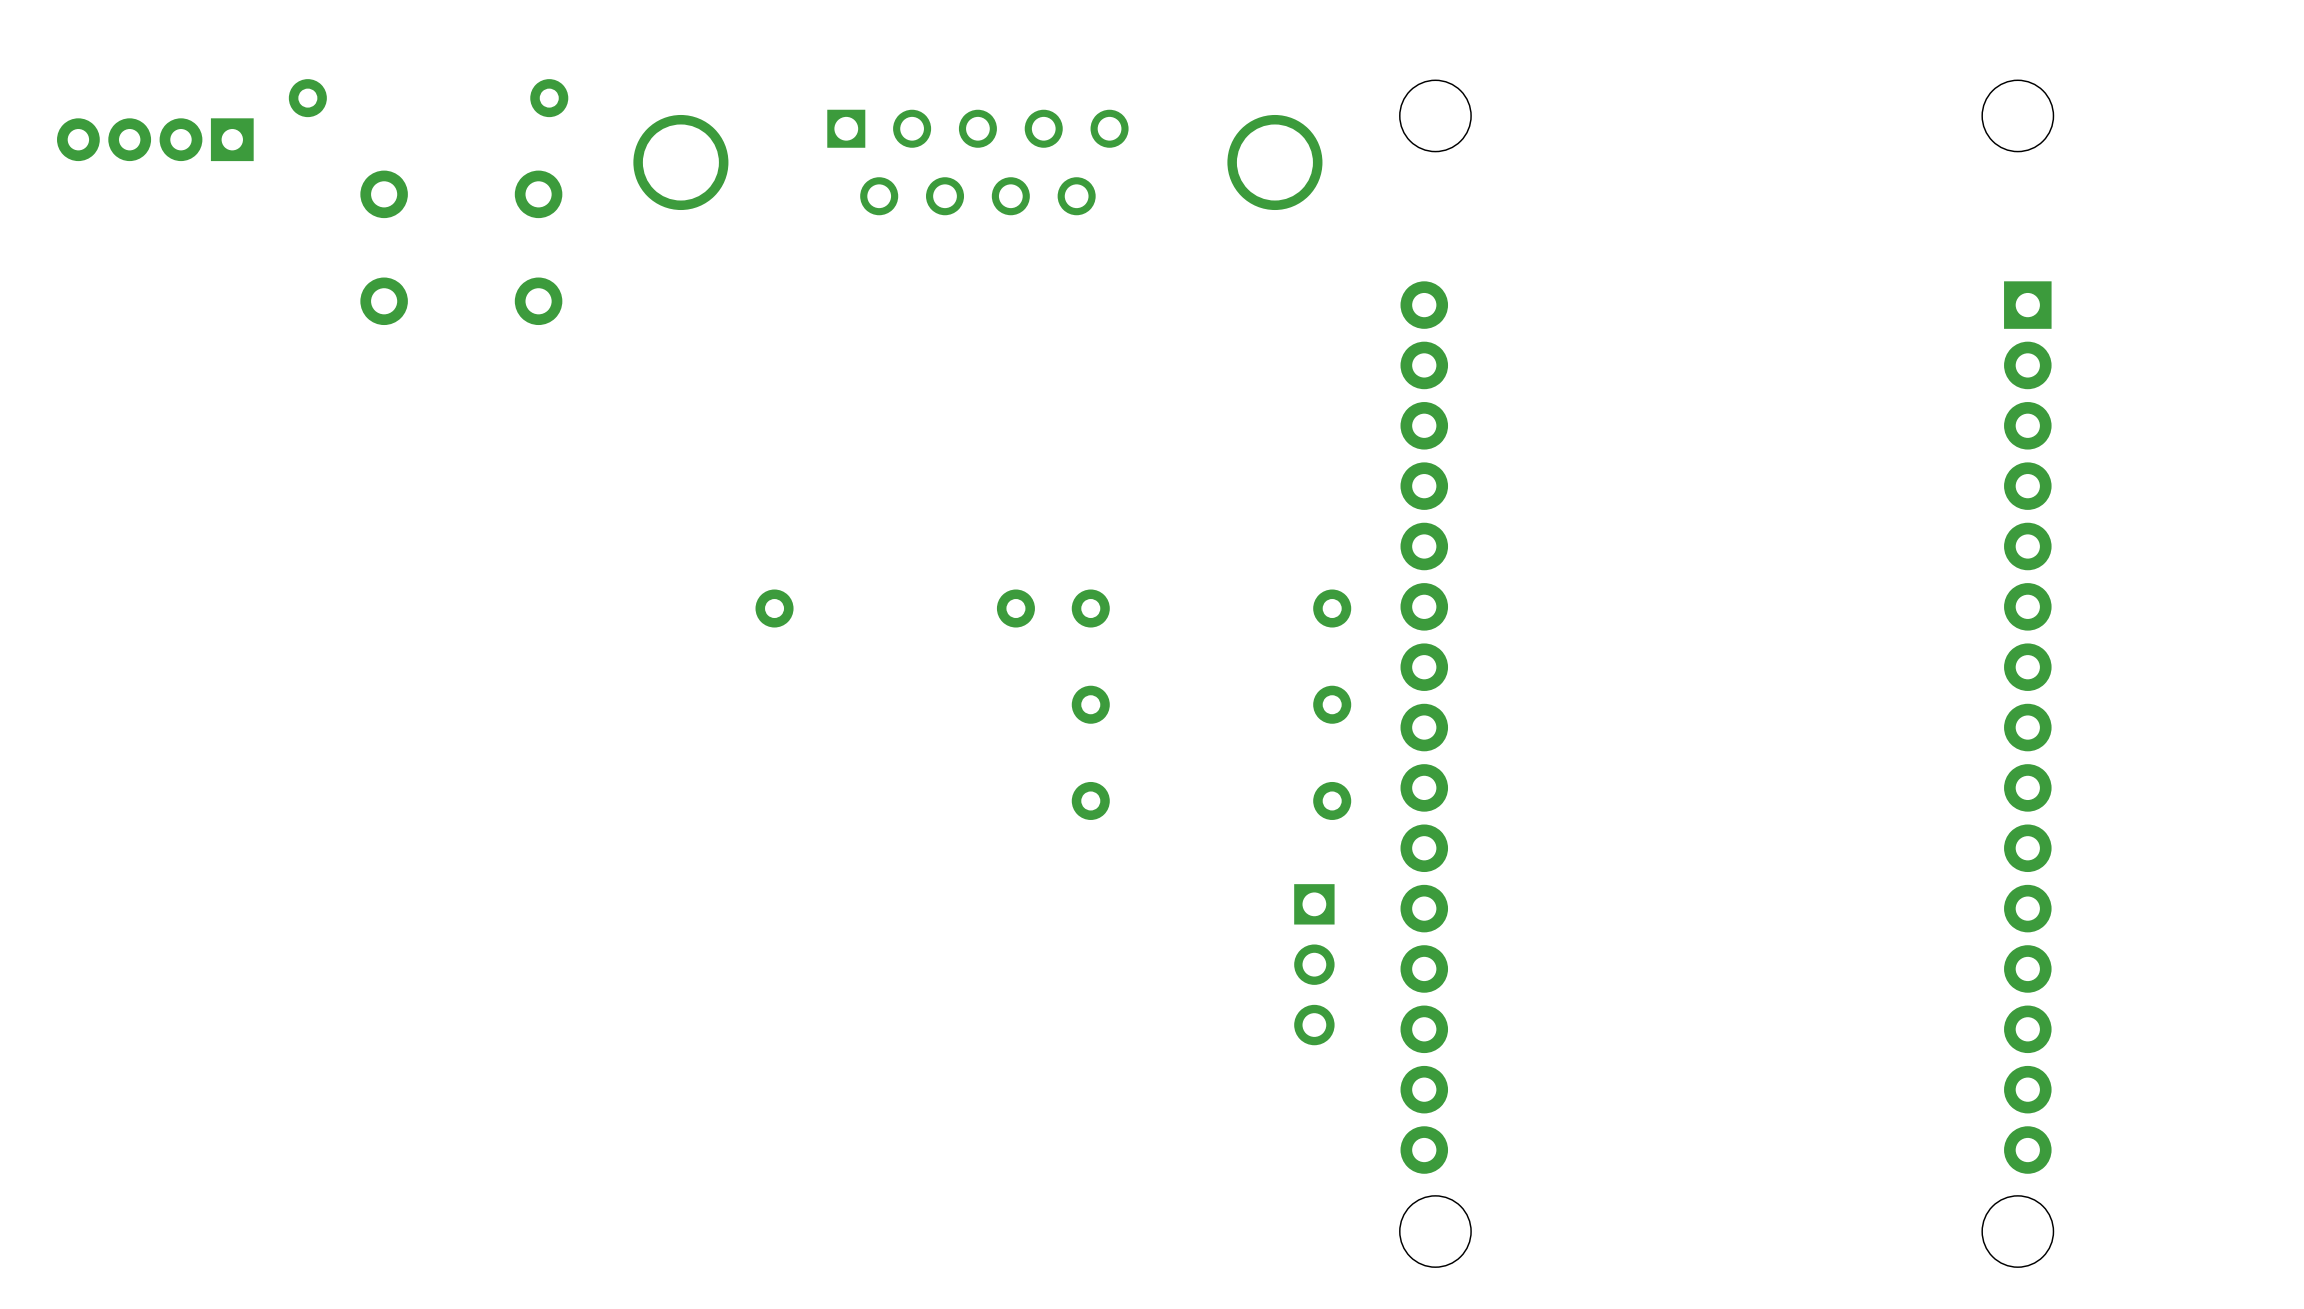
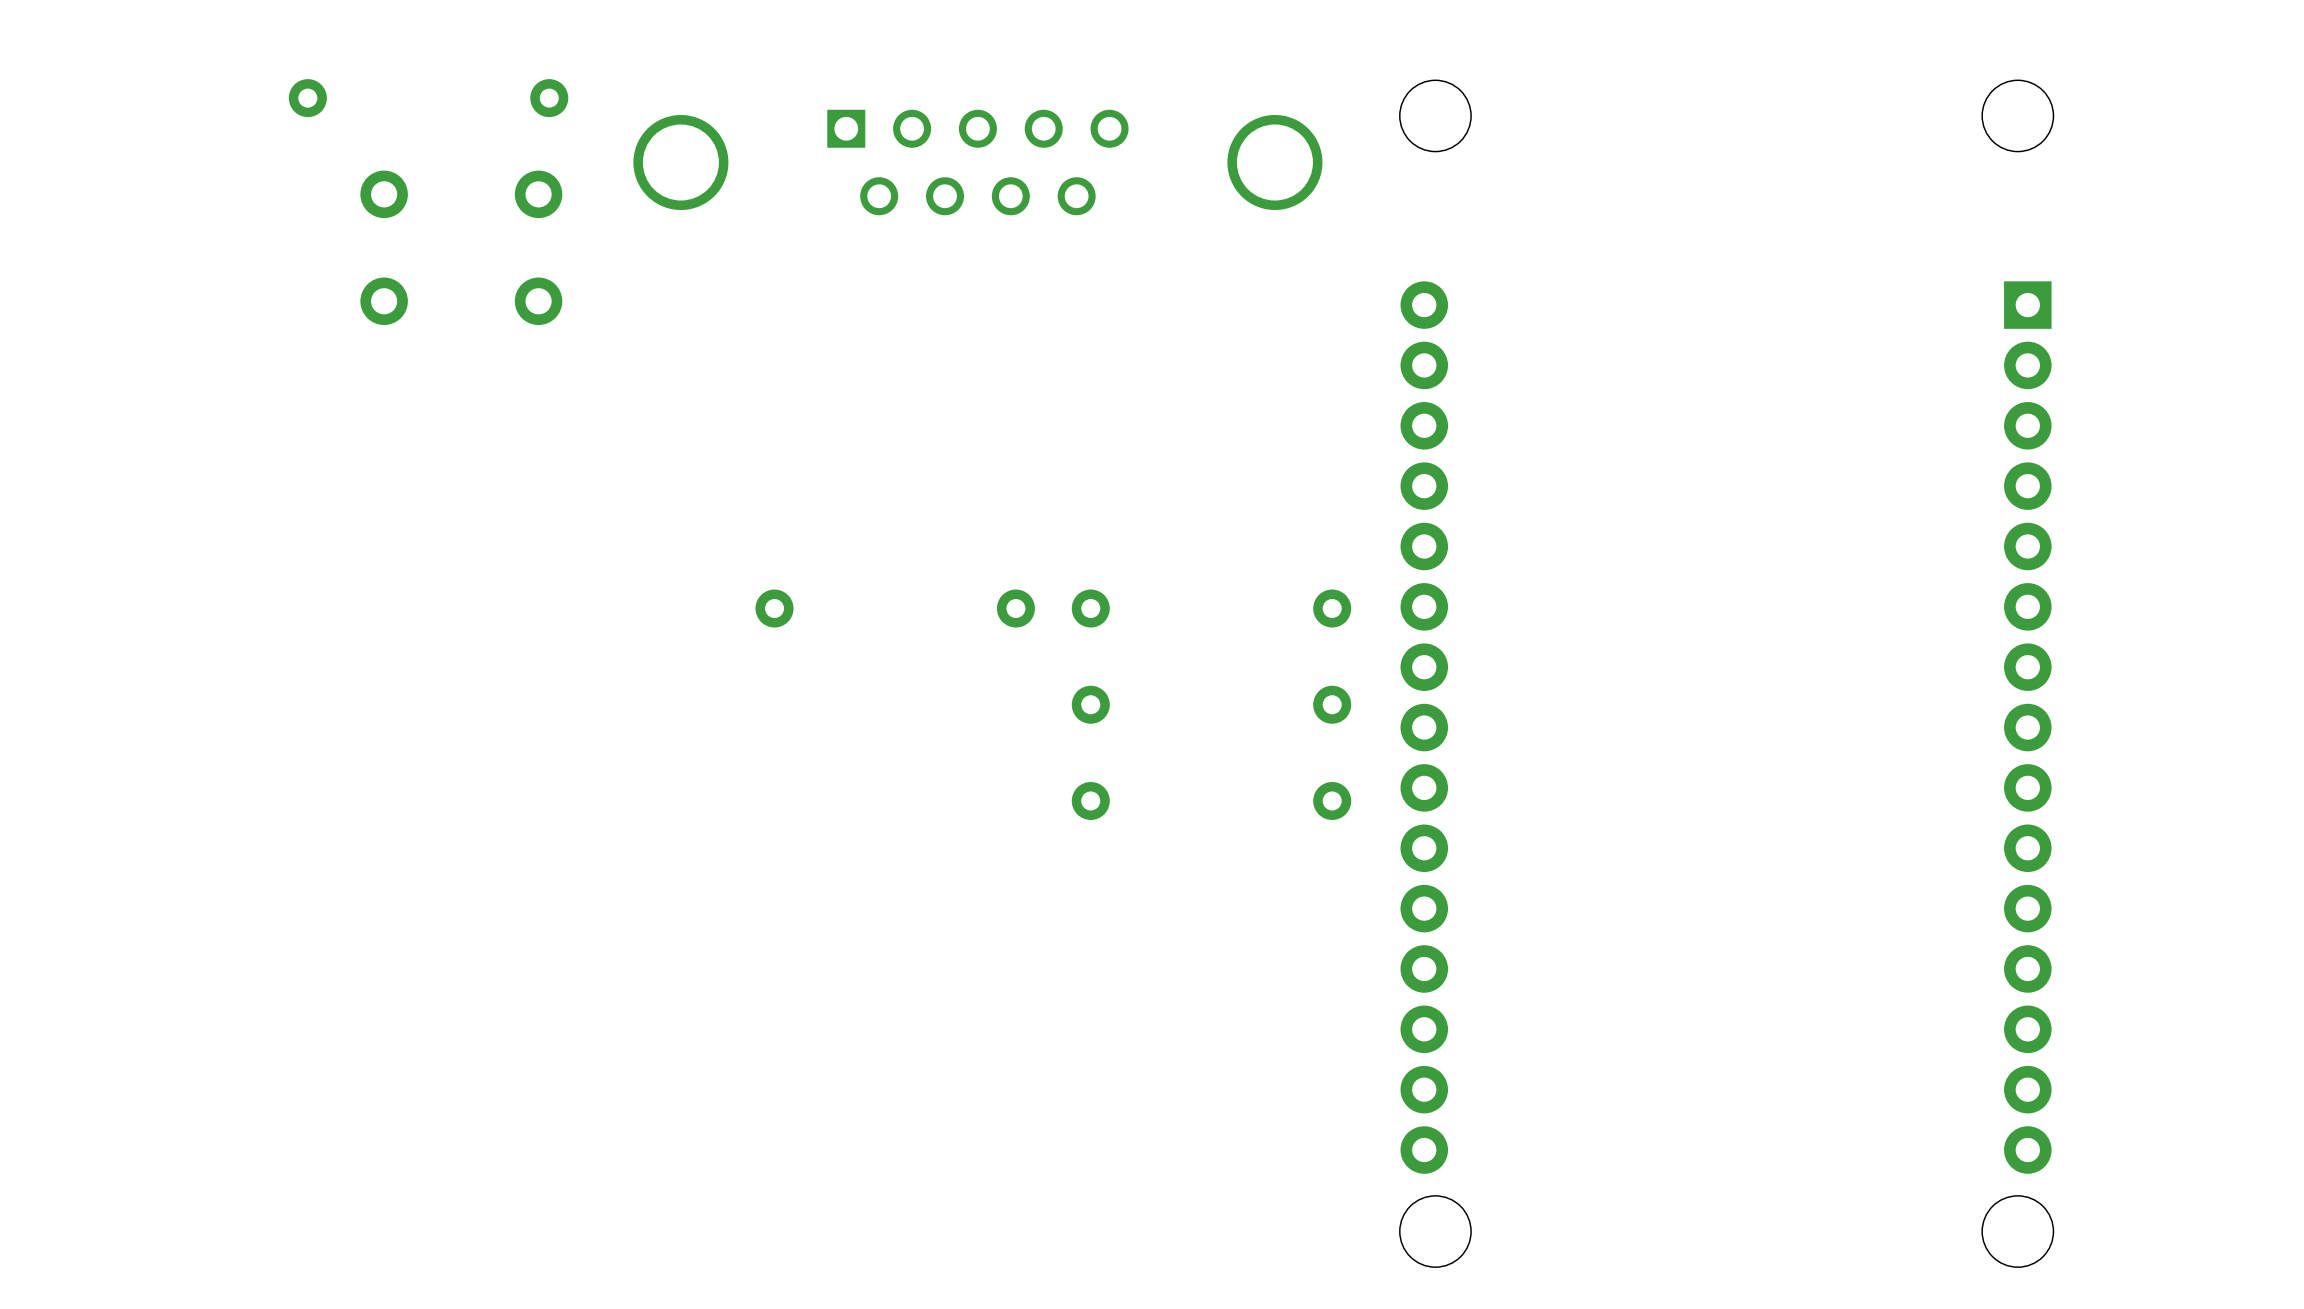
part: (155, 139) -> none
part: (1314, 964) -> none

